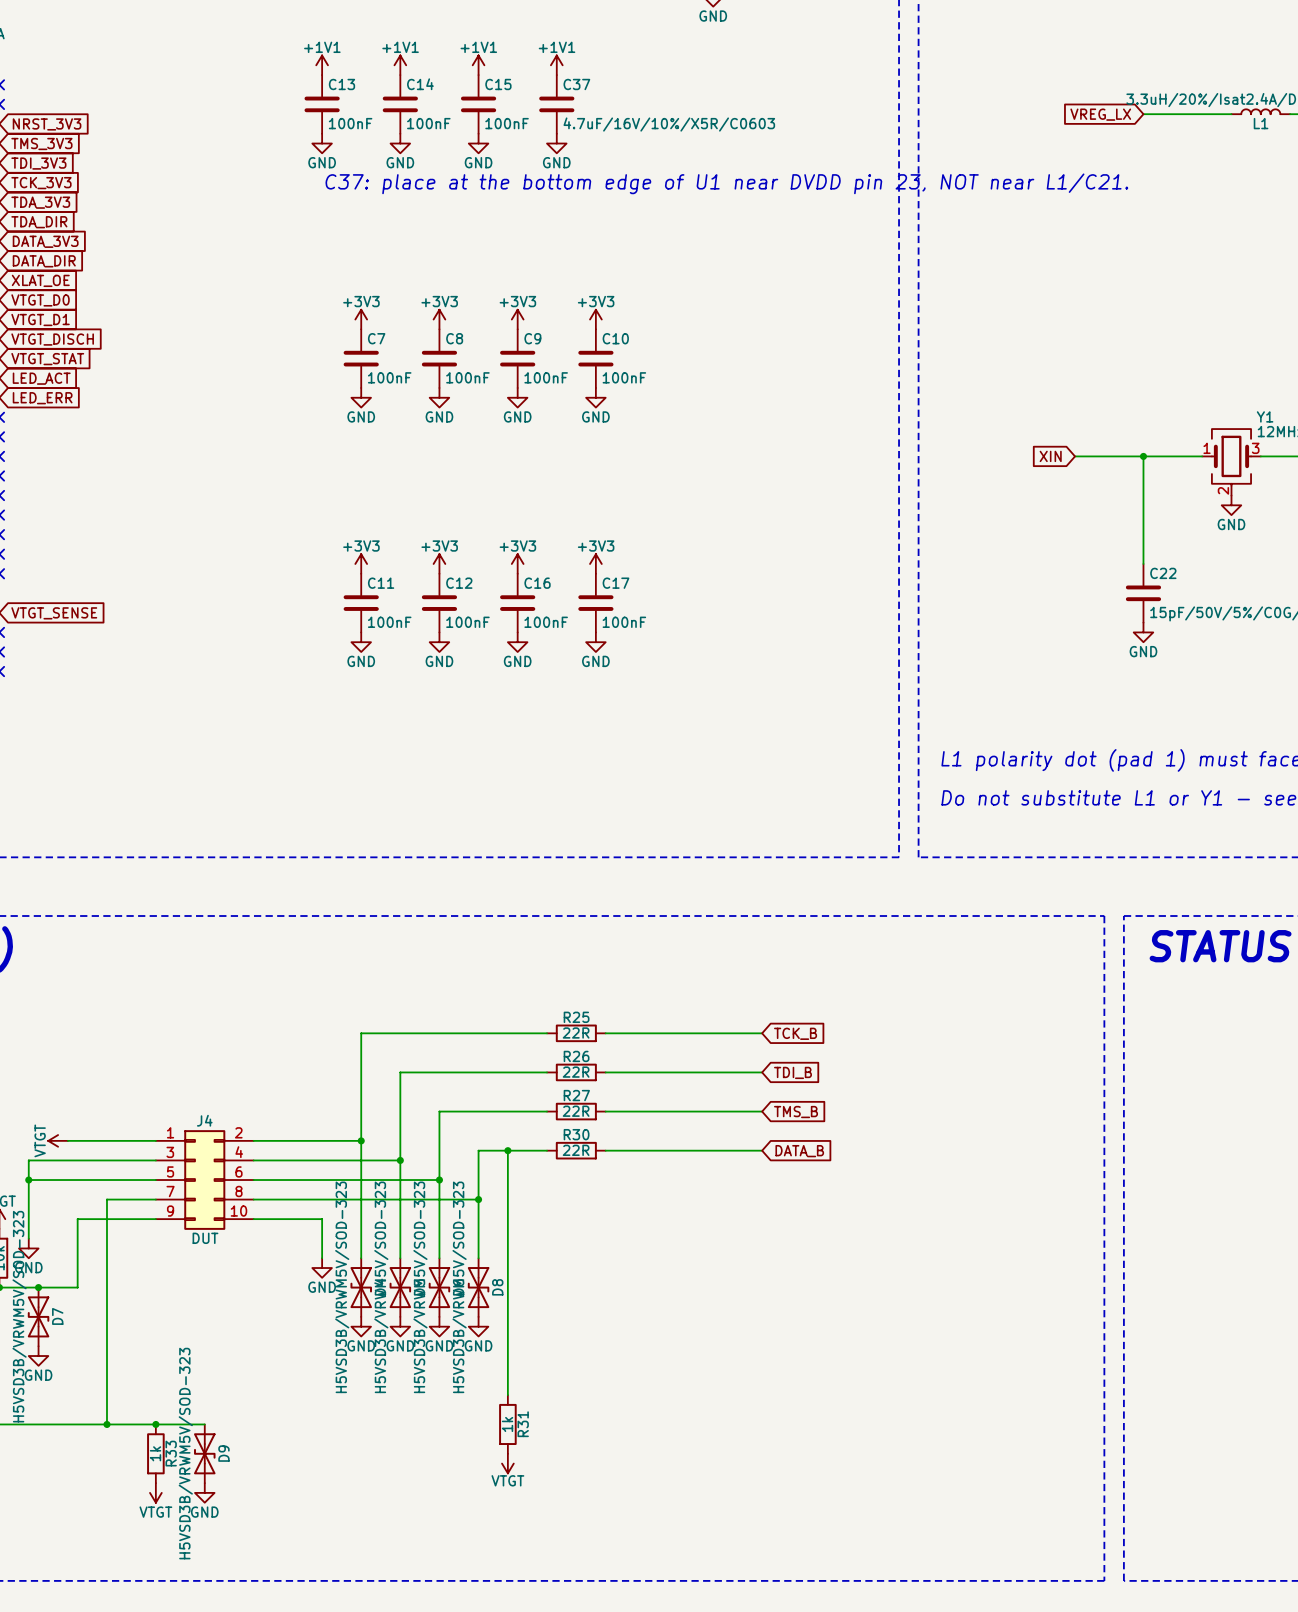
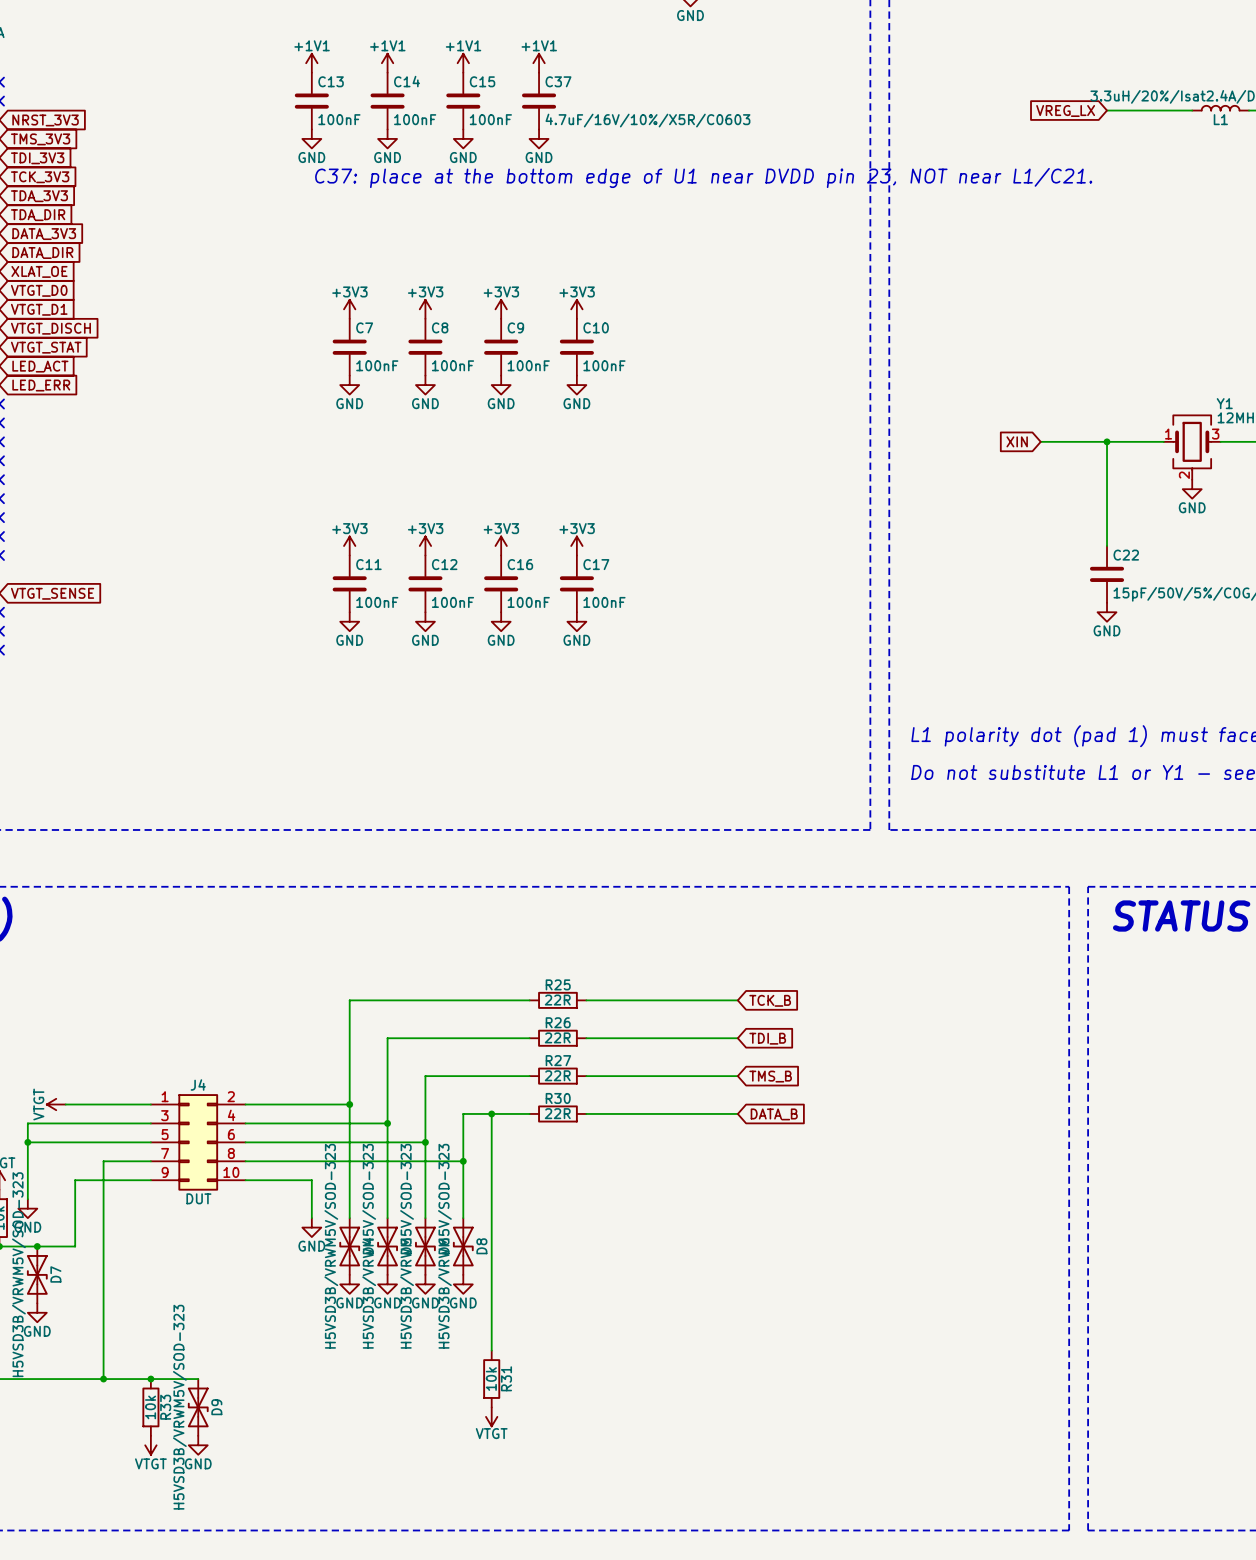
R31 value: 1k (507, 1424) -> 10k (491, 1379)
R33 value: 1k (155, 1453) -> 10k (150, 1407)

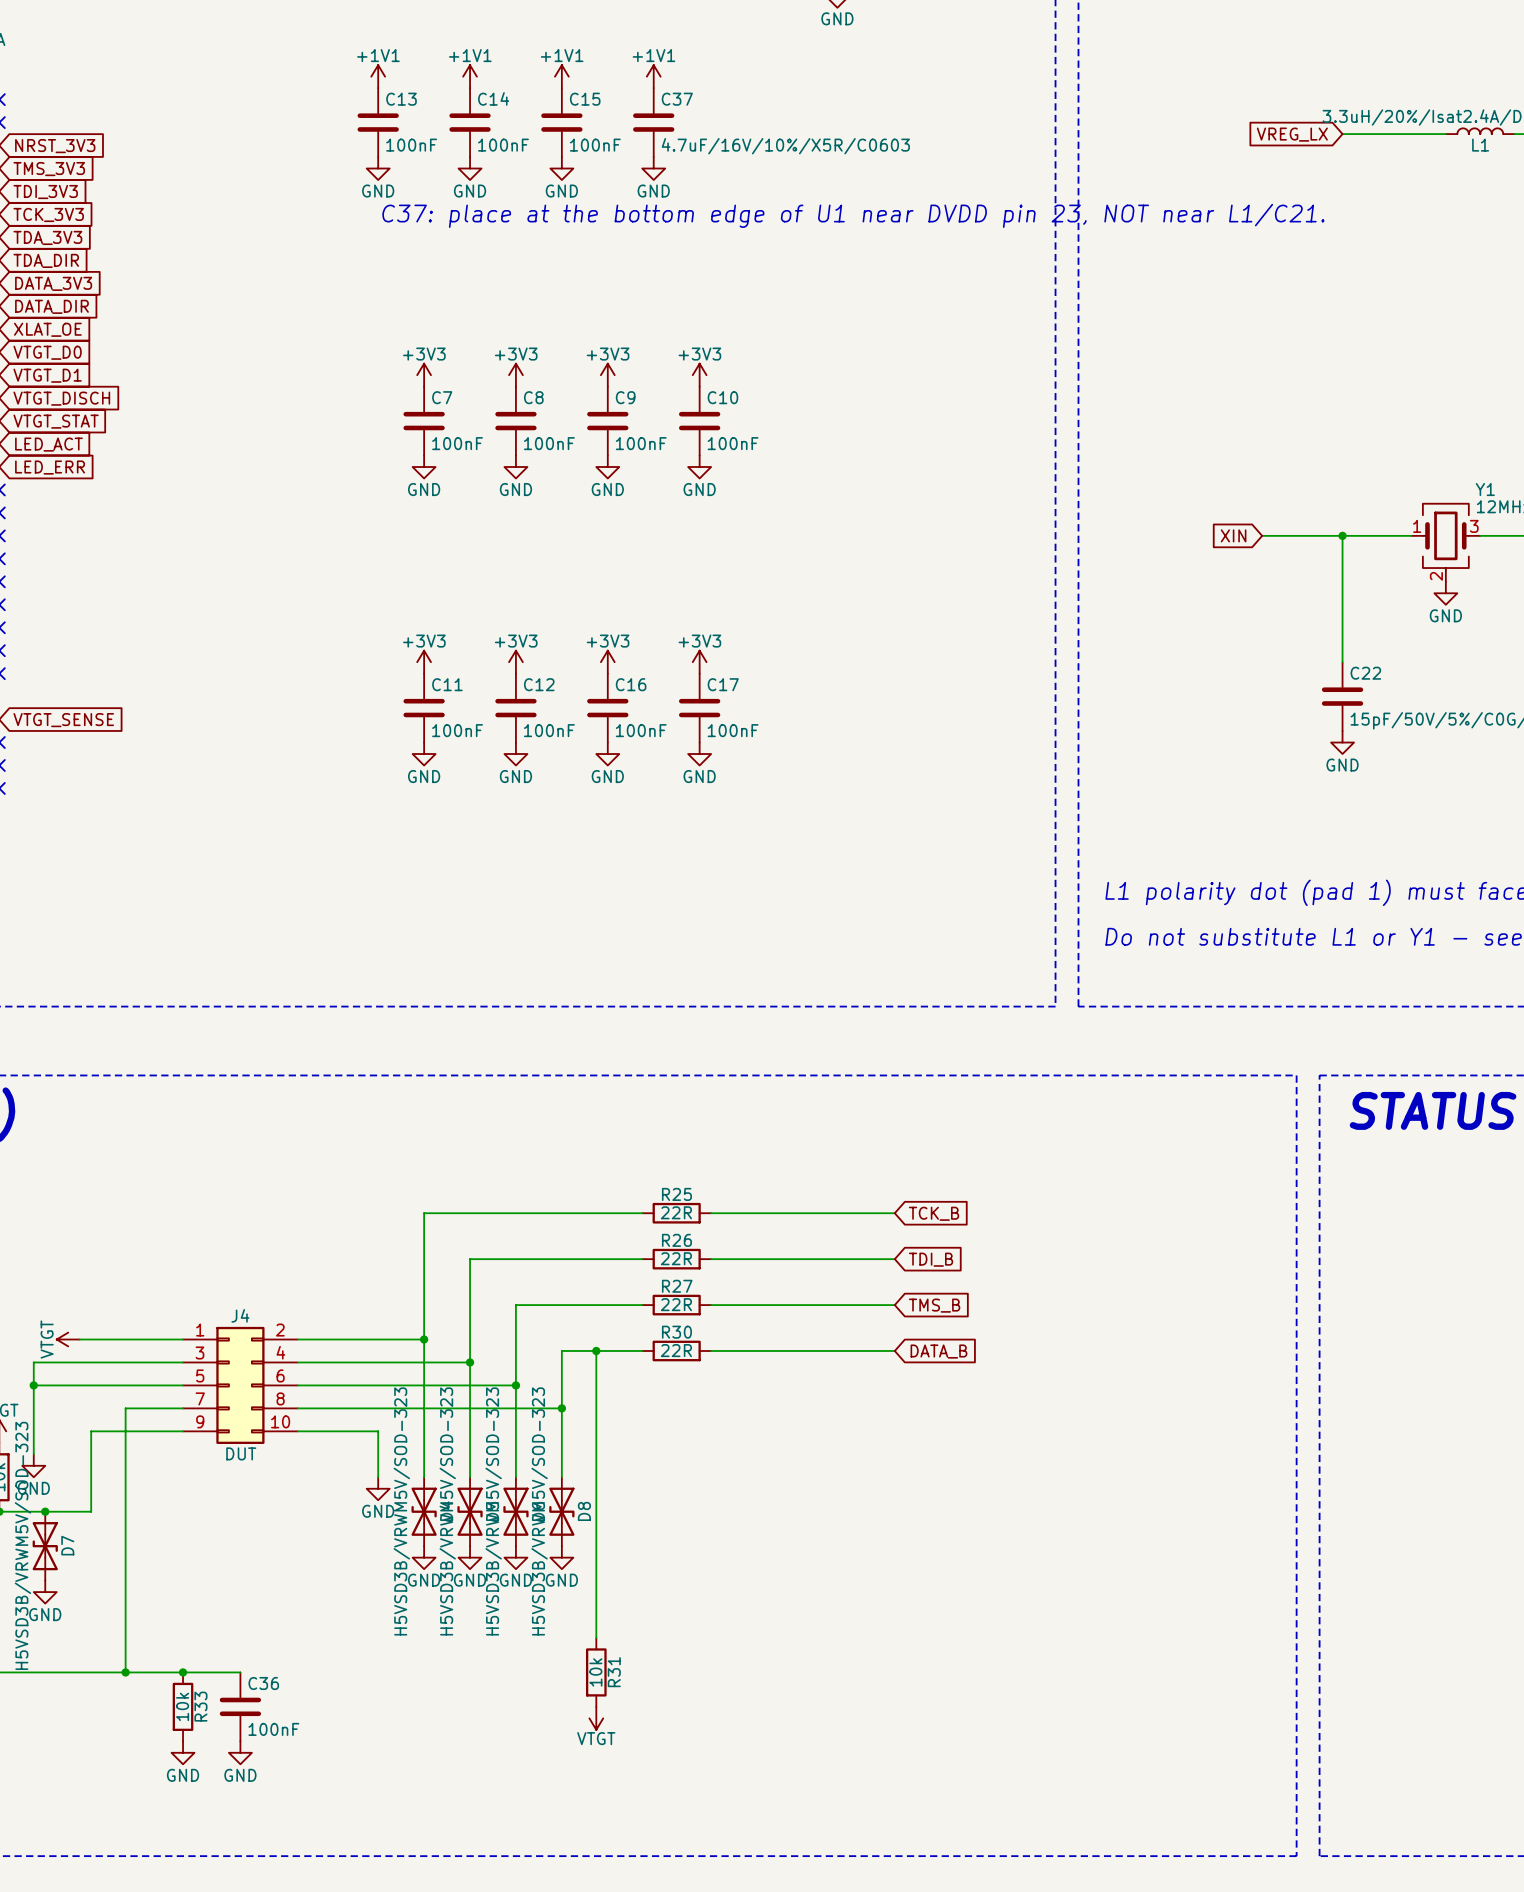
D9: H5VSD3B/VRWM5V/SOD-323 (198, 1407) -> none
C36: none -> 100nF (240, 1706)
power symbol: VTGT (150, 1445) -> GND (183, 1752)

